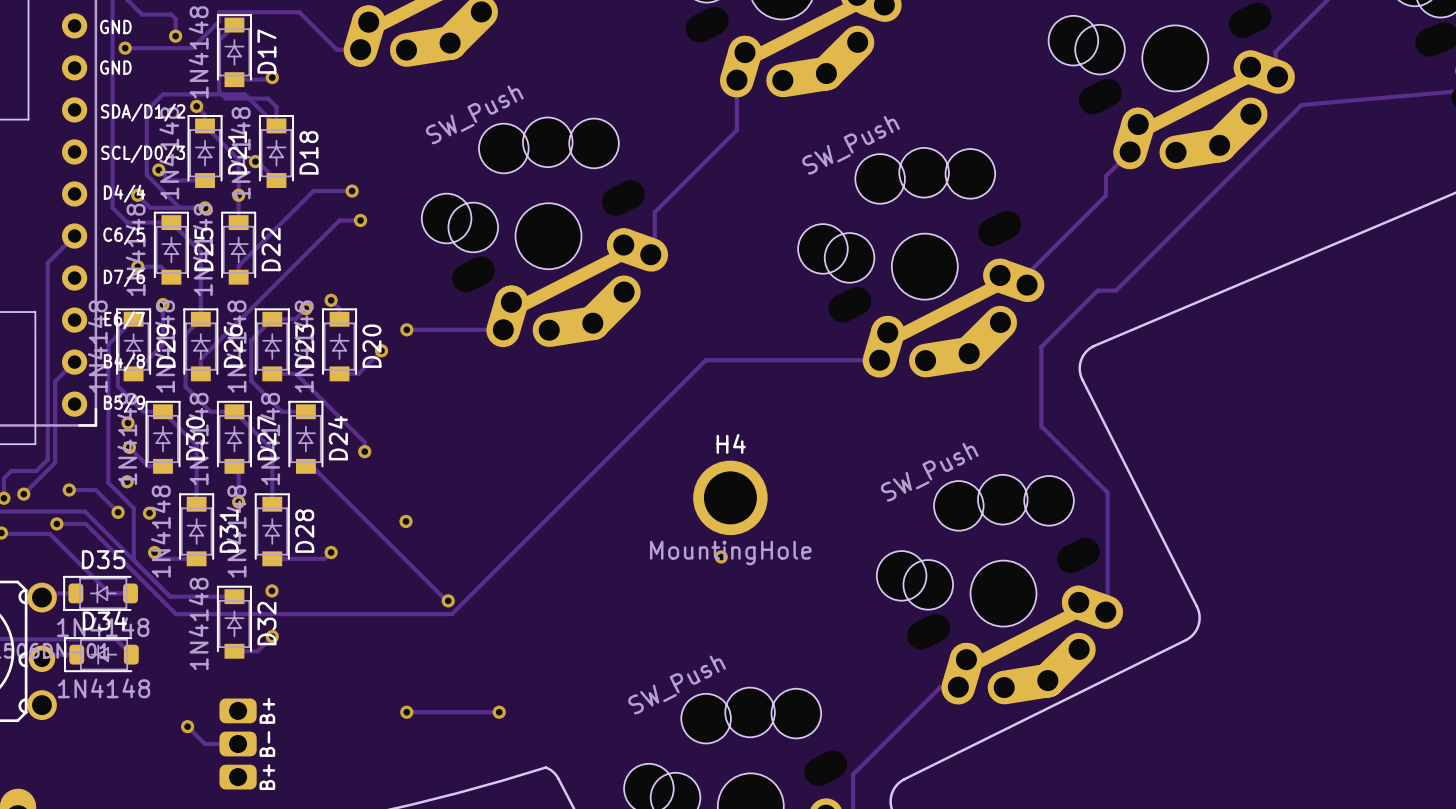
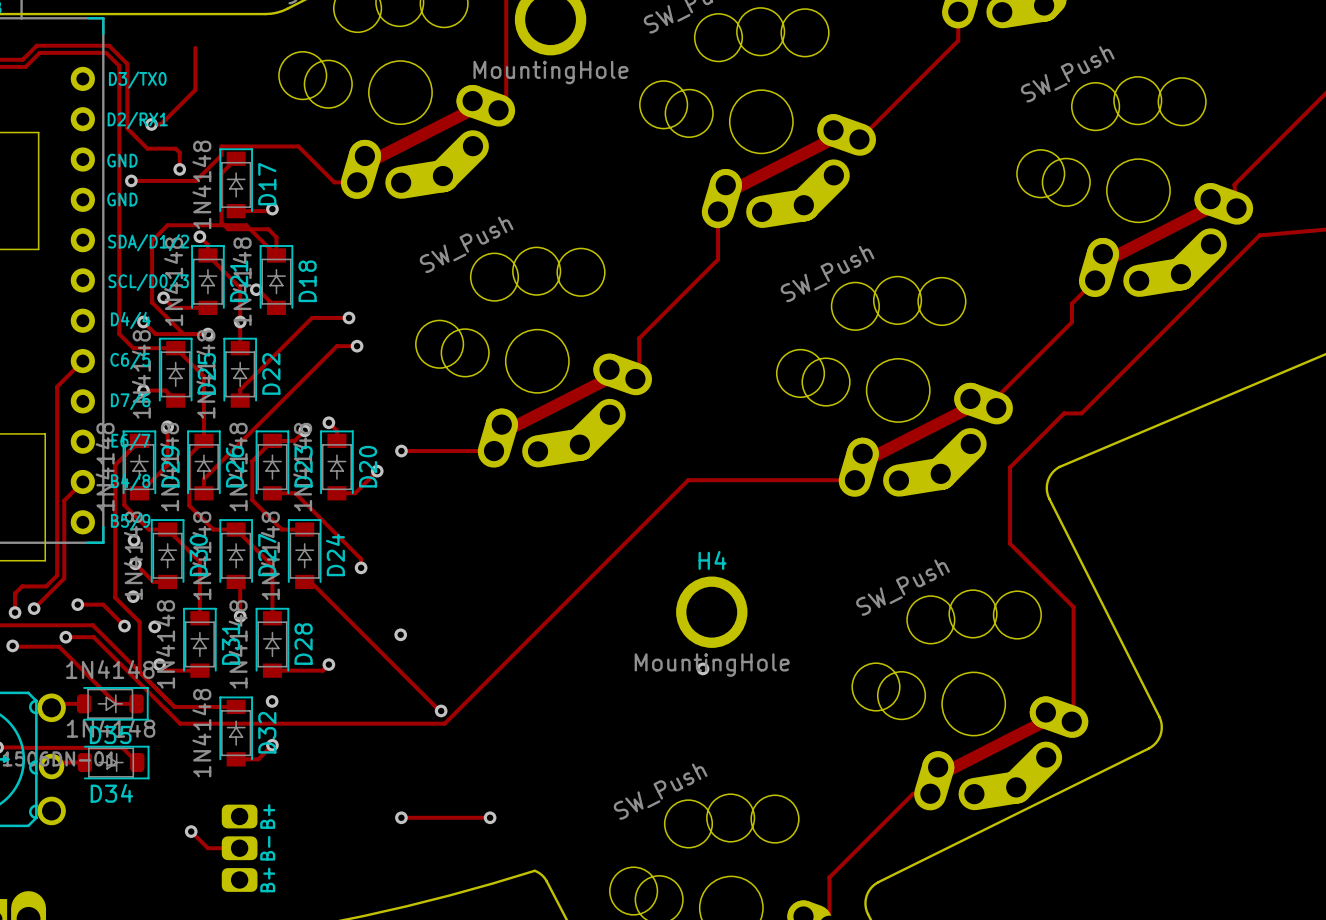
D35 rotation: 0° (100, 593) -> 180° (112, 703)
D34 rotation: 0° (101, 654) -> 180° (113, 762)

